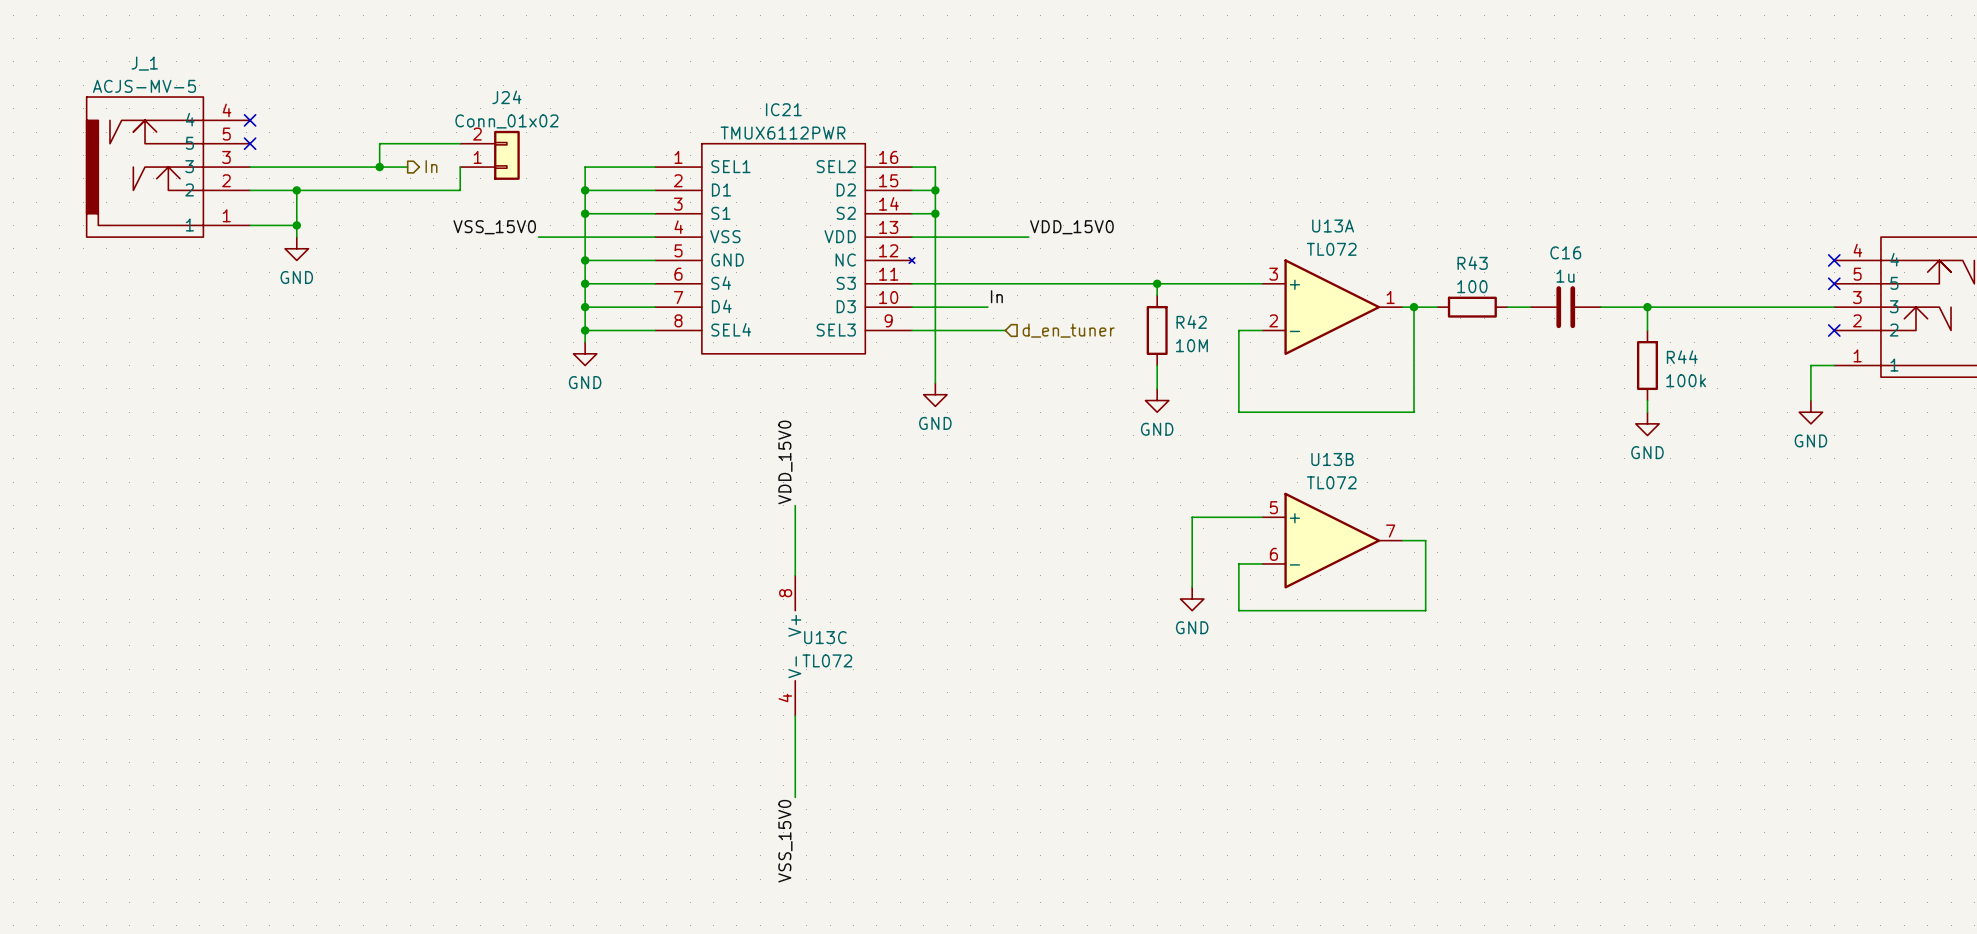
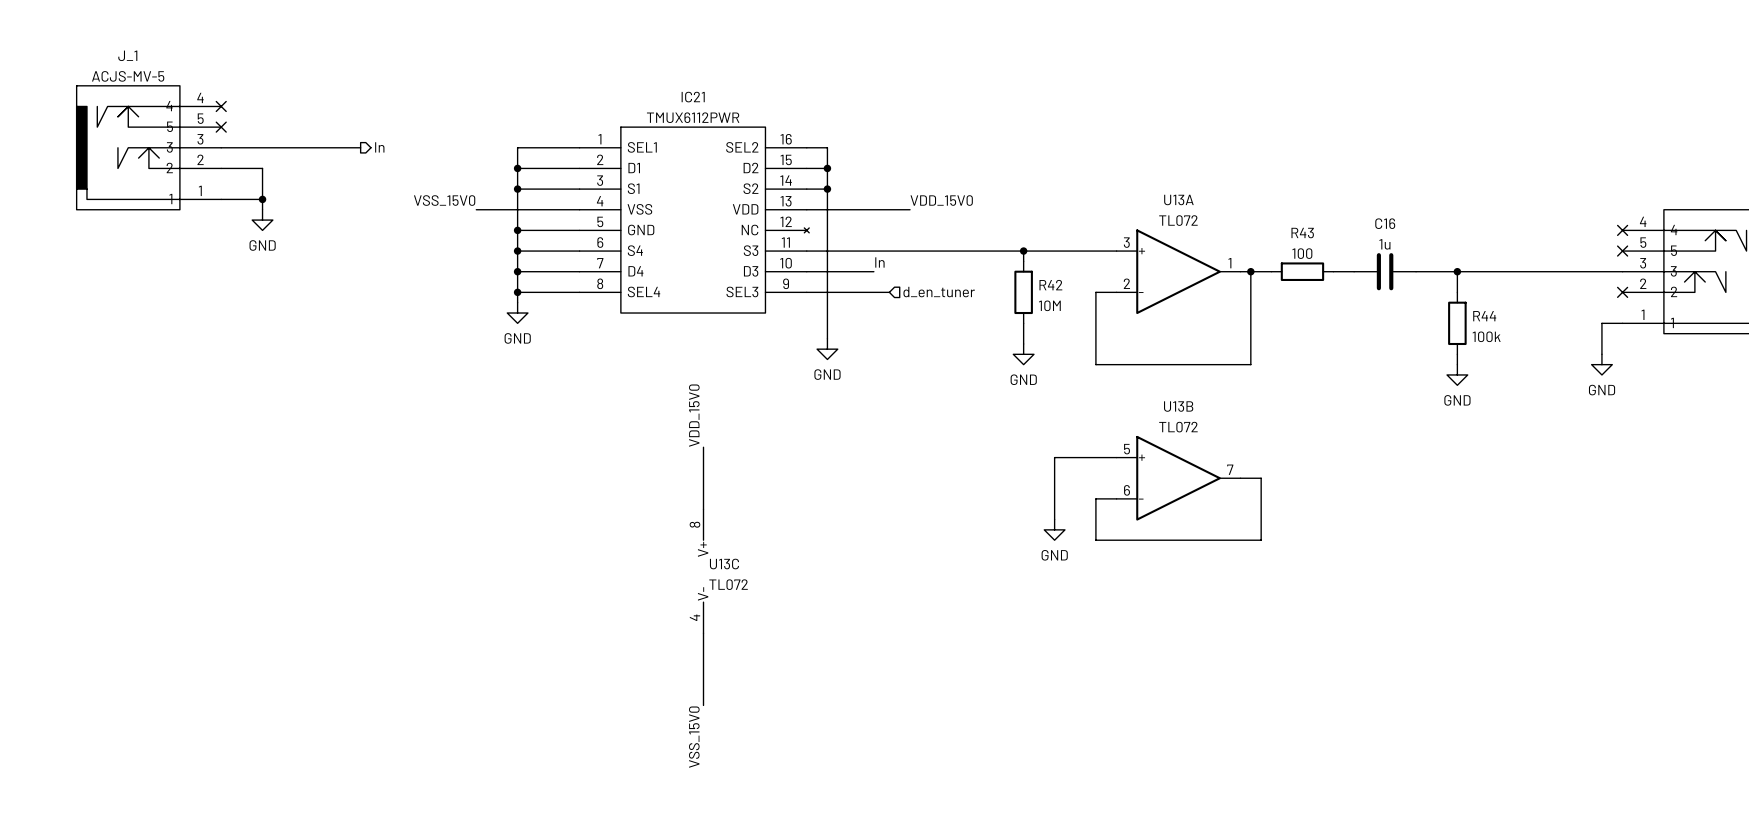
wire: (460, 143) (379, 143) (379, 167) -> none
J24: Conn_01x02 (489, 155) -> none
junction: (379, 167) -> none
wire: (460, 167) (460, 190) (296, 190) -> none
junction: (296, 190) -> none

